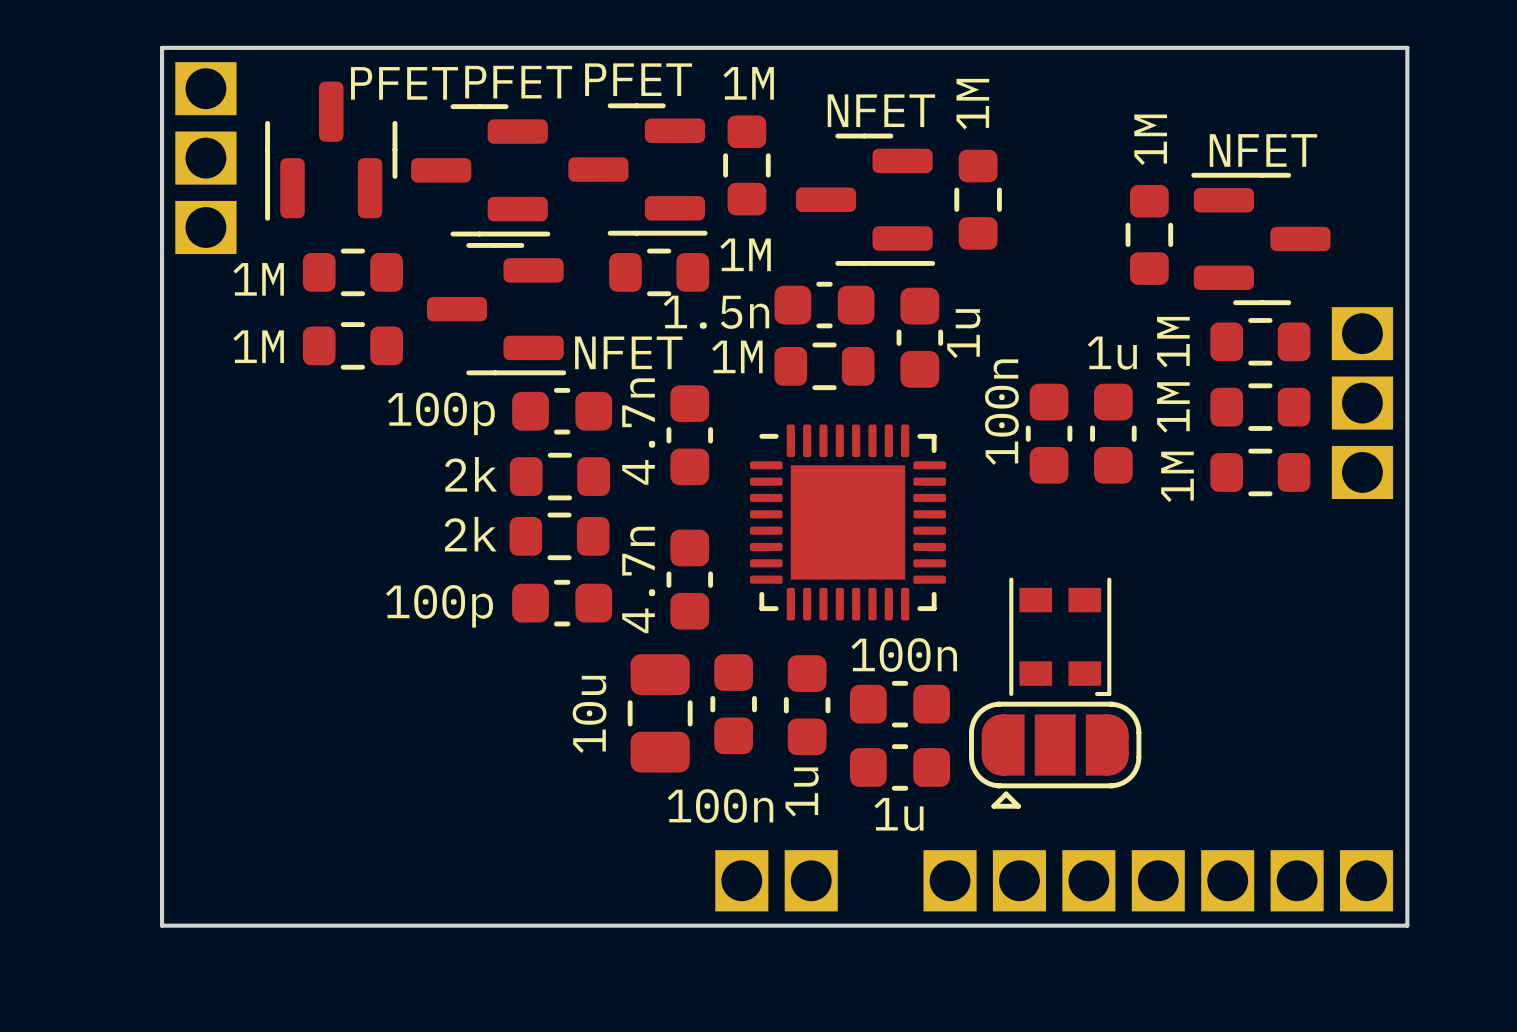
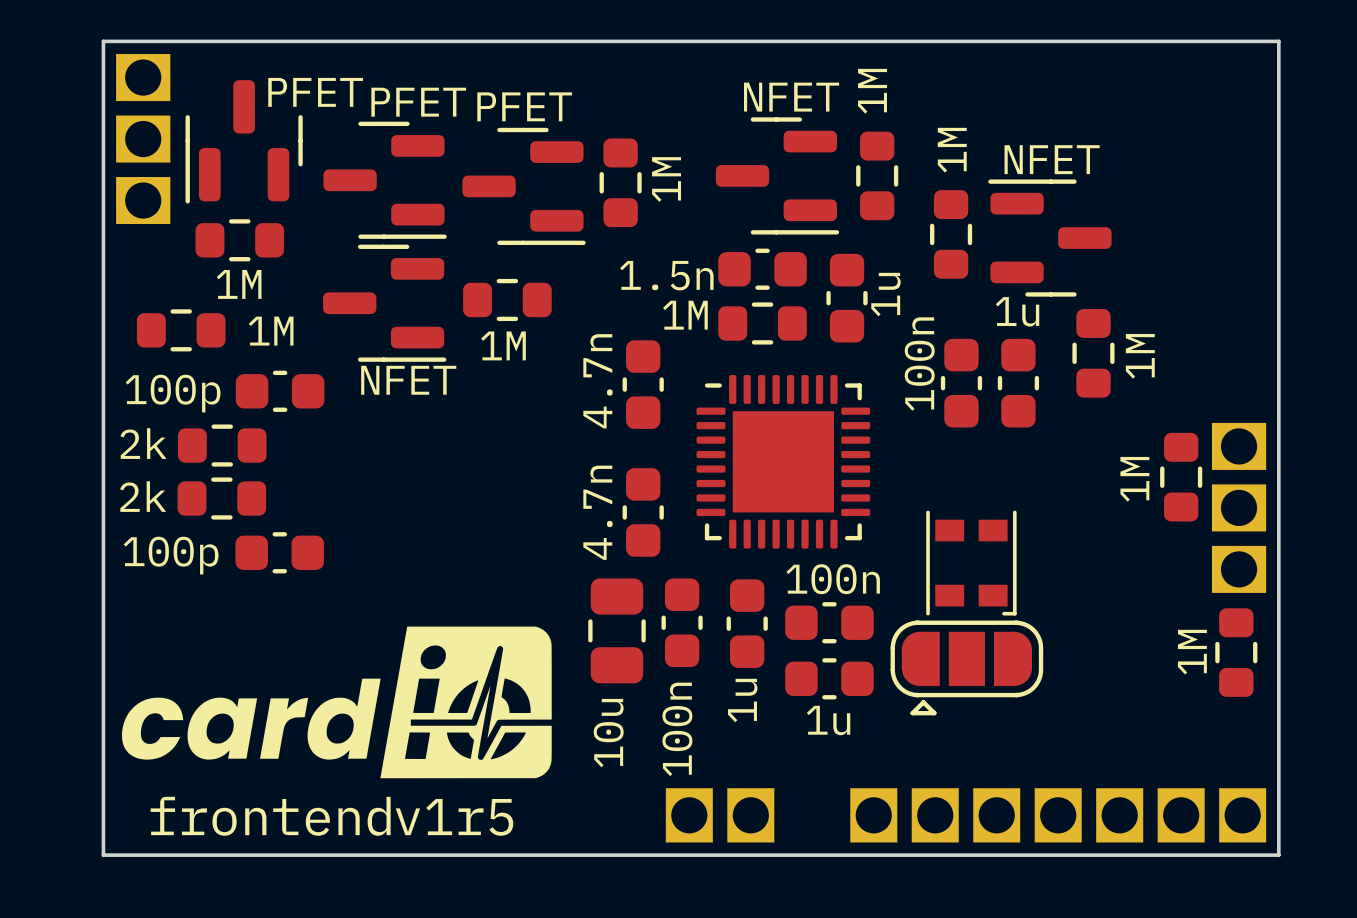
board edge: (162, 47) (162, 925) (1407, 925) -> (175, 41) (103, 41) (103, 855) (1278, 855) (1278, 818)
part: none -> (143, 77)
part: (205, 88) -> none
part footprint: [175, 131, 237, 185] -> [185, 80, 303, 204]
part value: 1M (1150, 139) -> none
part: (331, 151) -> none
part: none -> (143, 139)
part: 1M (746, 165) -> none
part position: (637, 169) -> (524, 186)
part position: (480, 170) -> (385, 180)
part footprint: [1125, 184, 1174, 285] -> [988, 179, 1112, 297]
part position: (865, 199) -> (777, 175)
part position: (978, 199) -> (877, 175)
part: none -> 1M (620, 182)
part: none -> (143, 200)
part: (205, 227) -> none
part: (1260, 238) -> none
part: none -> 1M (951, 234)
part: none -> 1M (239, 240)
part: 1M (352, 272) -> none
part: 1M (659, 272) -> none
part: (496, 309) -> none
part: (1362, 333) -> none
part: none -> 1M (507, 299)
part: 1M (1260, 341) -> none
part: none -> (384, 303)
part: 1M (352, 345) -> none
part: none -> 1M (181, 330)
part: none -> 1M (1093, 353)
part: (1362, 403) -> none
part: 1M (1260, 407) -> none
part: 100p (562, 411) -> none
part: none -> 100p (280, 391)
part: 1M (1260, 472) -> none
part position: (1362, 472) -> (1239, 446)
part: 2k (559, 476) -> none
part: none -> 2k (222, 445)
part: 2k (559, 536) -> none
part: none -> 1M (1181, 477)
part: none -> 2k (221, 498)
part: none -> (1239, 507)
part: 100p (562, 603) -> none
part: none -> 100p (279, 552)
part: none -> (1239, 569)
drawing: none -> [121, 626, 552, 779]
part value position: 10u (589, 714) -> 10u (608, 733)
part: none -> 1M (1236, 652)
part value rotation: 0° (720, 806) -> 90° counterclockwise (677, 729)
part: (741, 880) -> none
part: (811, 880) -> none
part: (950, 880) -> none
part: (1019, 880) -> none
part: (1088, 880) -> none
part: (1158, 880) -> none
part: (1227, 880) -> none
part: (1297, 880) -> none
part: (1366, 880) -> none
part: none -> (689, 815)
part: none -> (750, 815)
part: none -> (873, 815)
part: none -> (935, 815)
part: none -> (996, 815)
part: none -> (1058, 815)
part: none -> (1119, 815)
part: none -> (1181, 815)
part: none -> (1242, 815)
text: none -> frontend (270, 816)
text: none -> v1r5 (454, 817)

